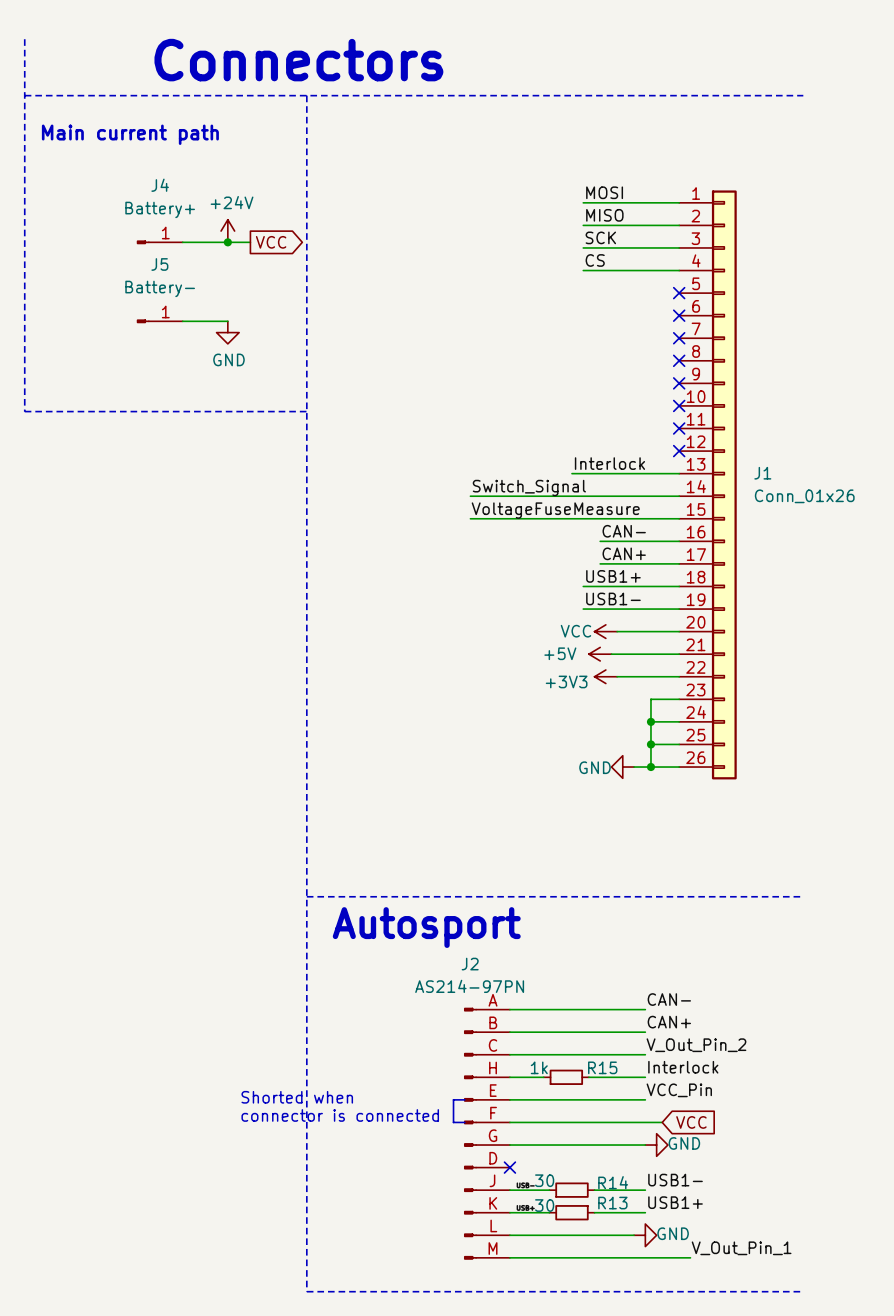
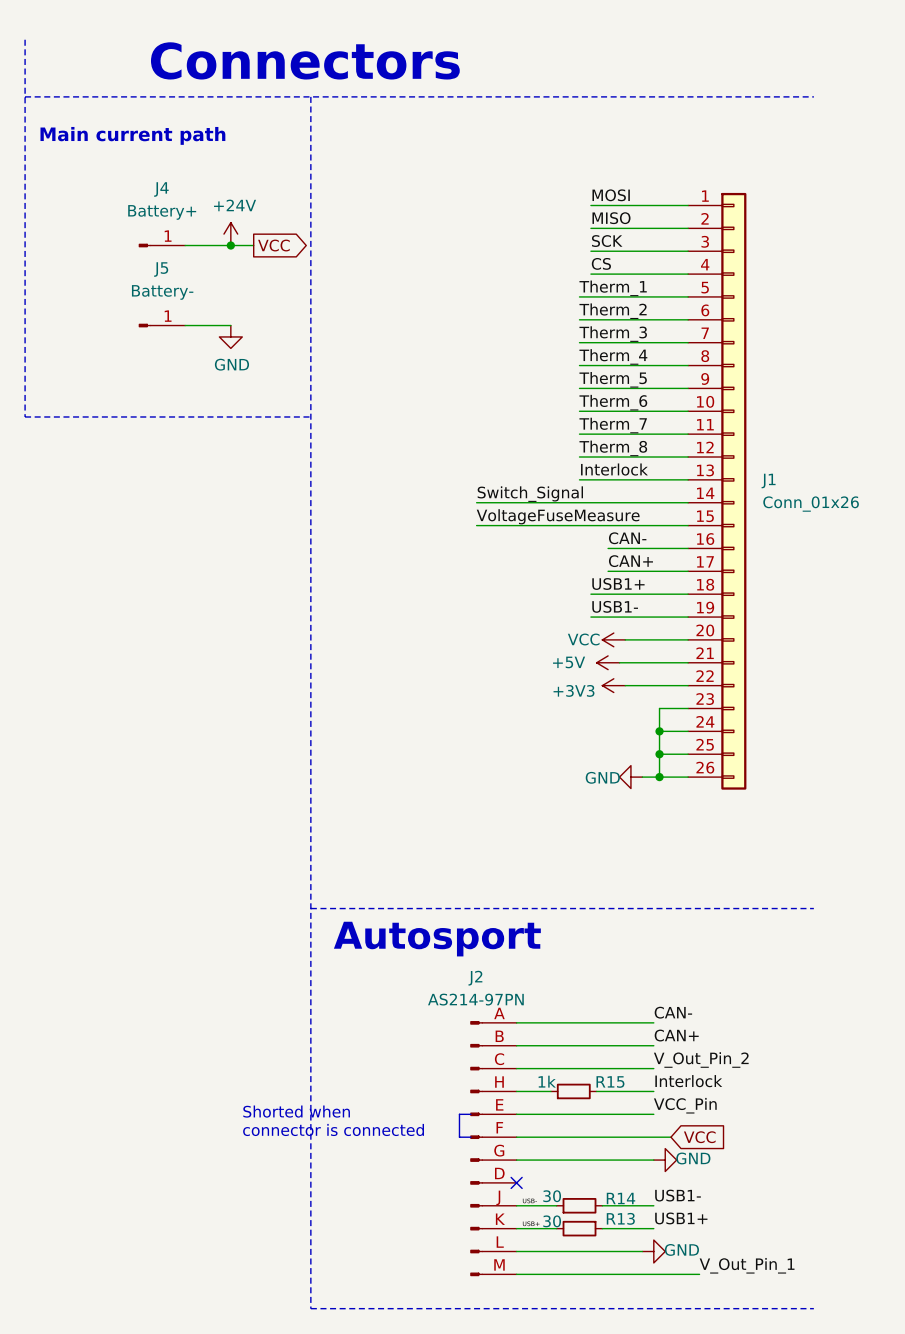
label: none -> Therm_1 (613, 288)
wire: none -> (579, 296) (688, 296)
no-connect mark: (679, 293) -> none
label: none -> Therm_2 (613, 311)
wire: none -> (579, 319) (688, 319)
no-connect mark: (679, 315) -> none
label: none -> Therm_3 (613, 334)
wire: none -> (579, 342) (688, 342)
no-connect mark: (679, 338) -> none
label: none -> Therm_4 (613, 356)
wire: none -> (579, 365) (688, 365)
no-connect mark: (679, 360) -> none
label: none -> Therm_5 (613, 379)
wire: none -> (579, 388) (688, 388)
no-connect mark: (679, 383) -> none
label: none -> Therm_6 (613, 402)
wire: none -> (579, 411) (688, 411)
no-connect mark: (679, 405) -> none
label: none -> Therm_7 (613, 425)
wire: none -> (579, 434) (688, 434)
no-connect mark: (679, 428) -> none
label: none -> Therm_8 (613, 448)
wire: none -> (579, 457) (688, 457)
no-connect mark: (679, 451) -> none

